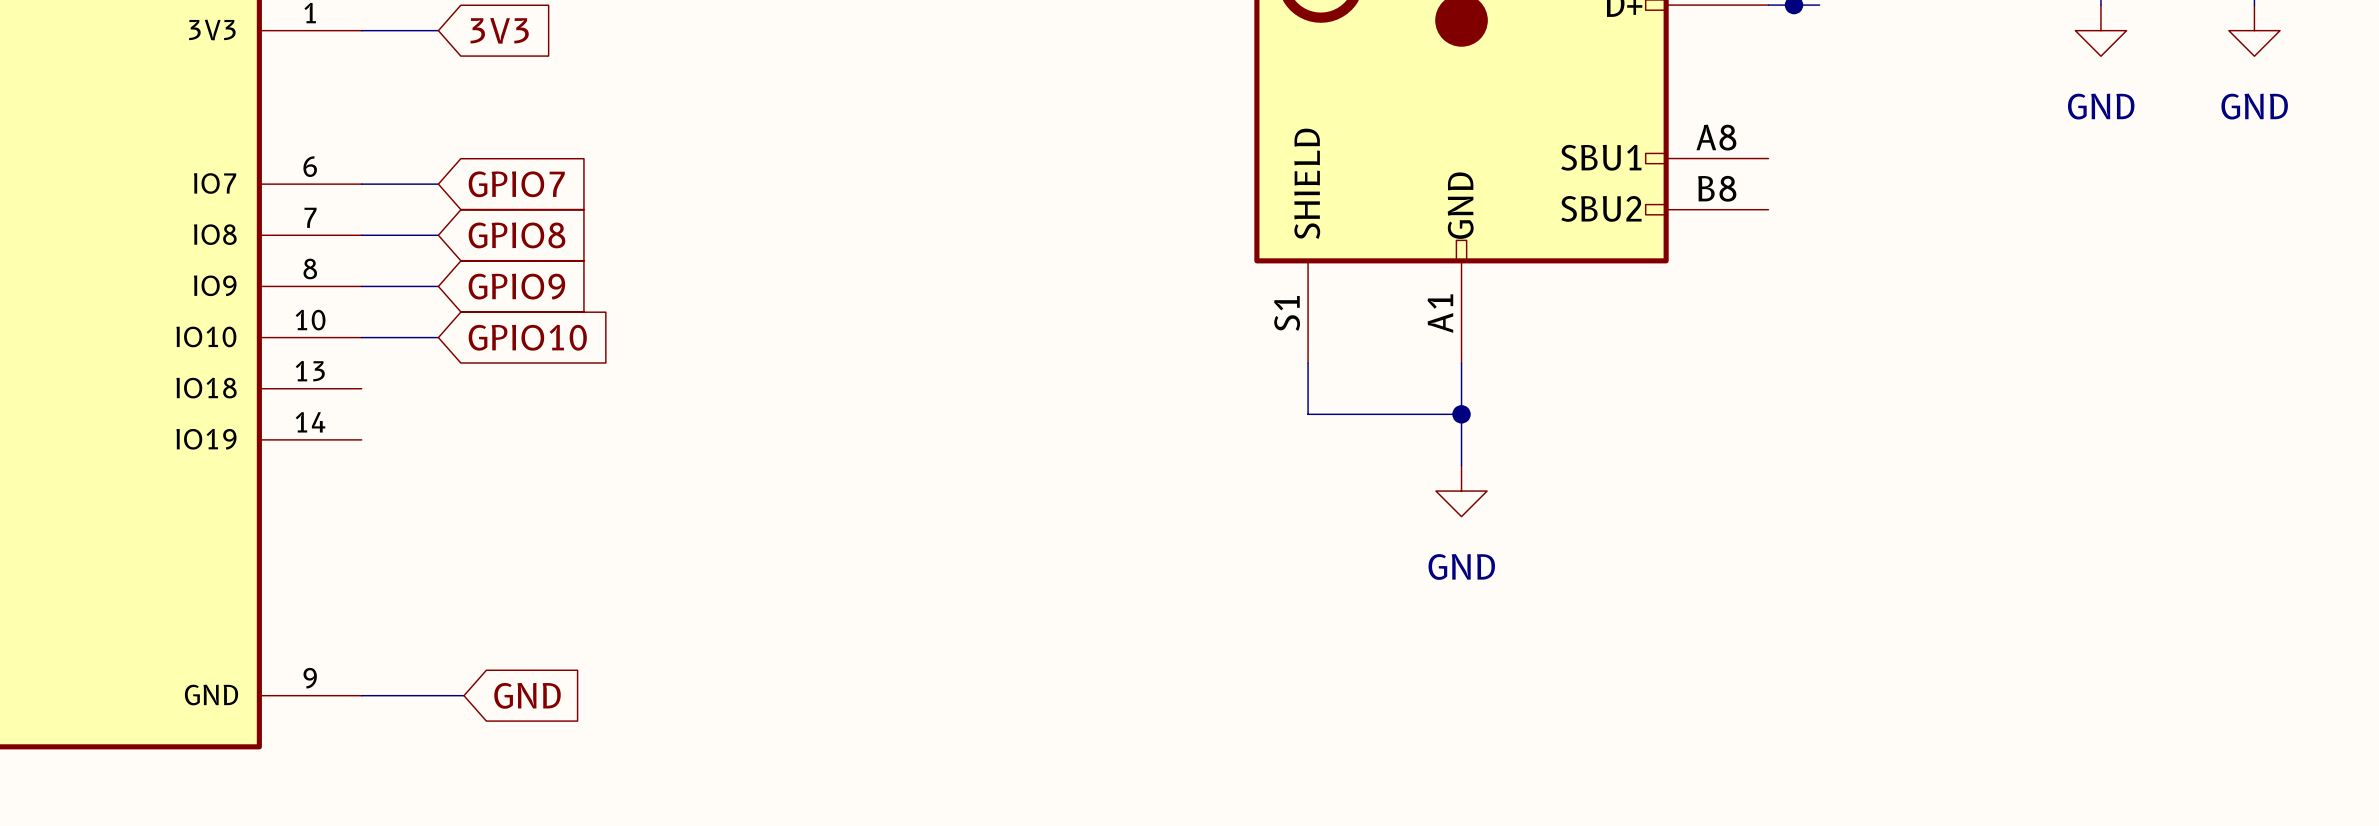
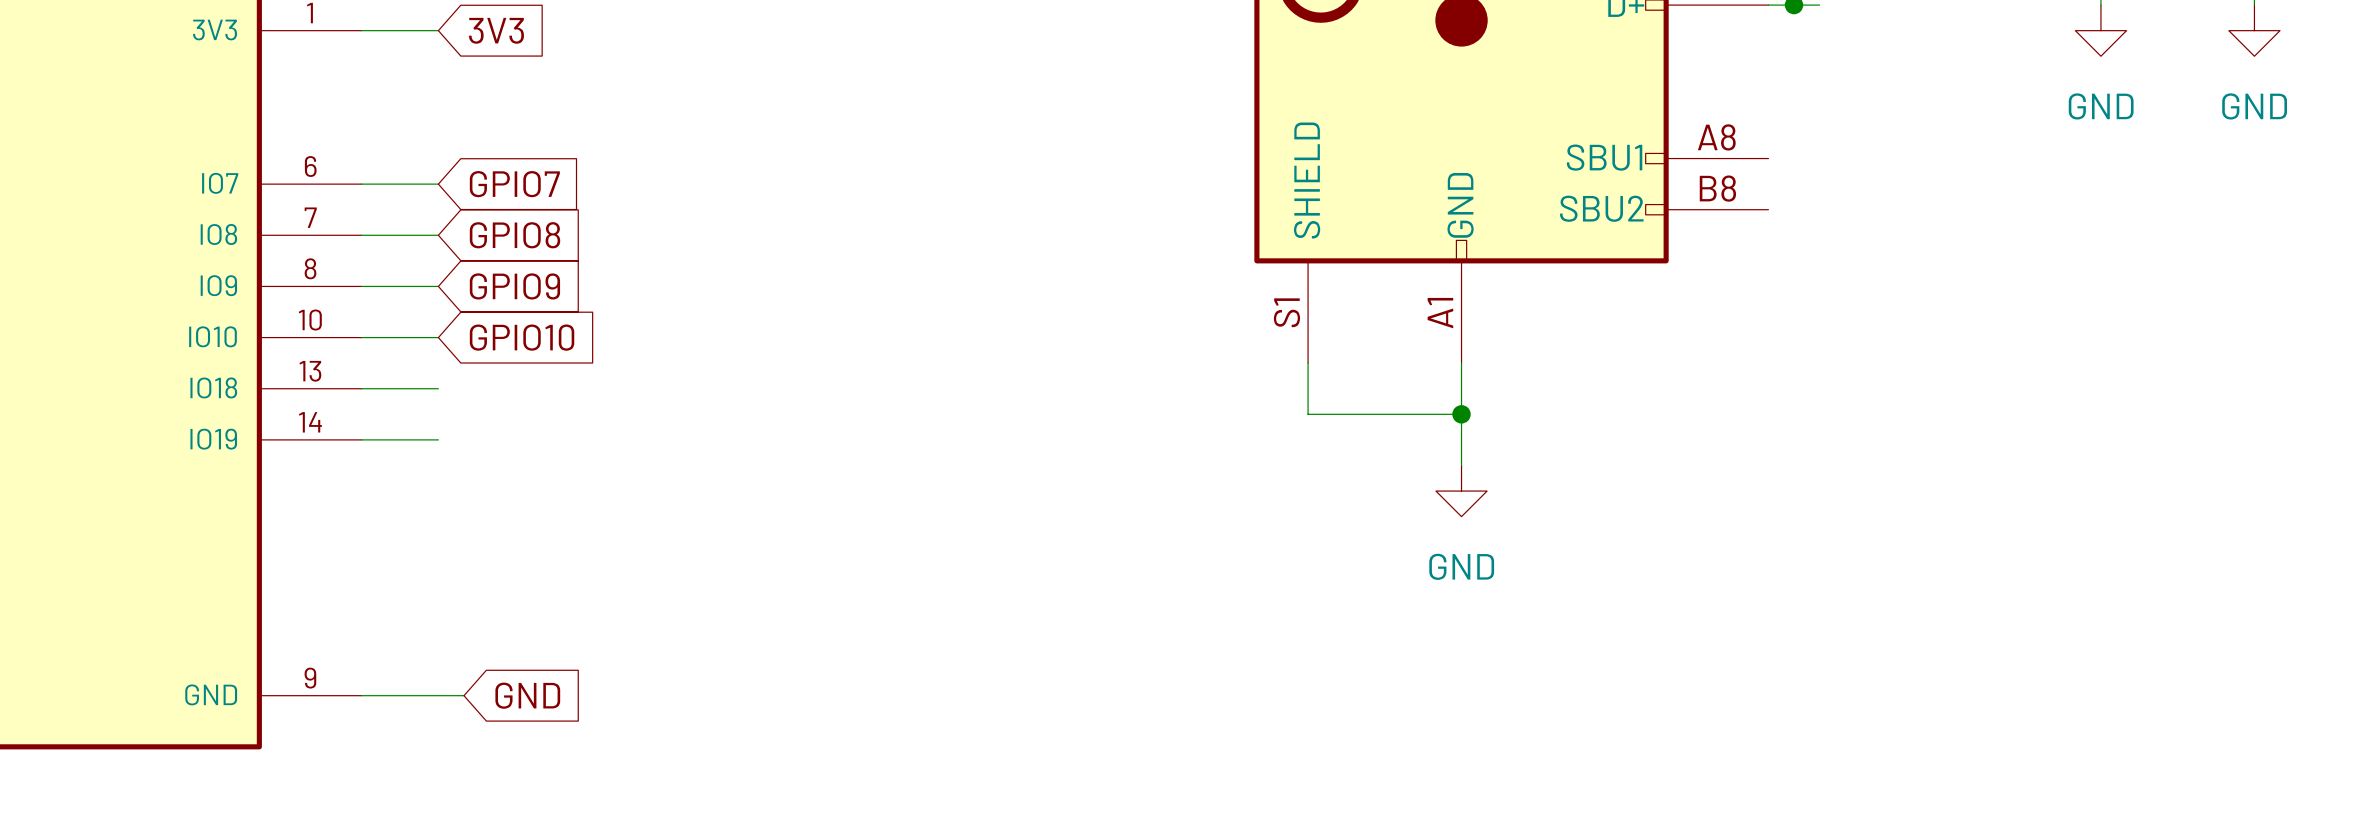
wire: none -> (361, 388) (438, 388)
wire: none -> (361, 439) (438, 439)

